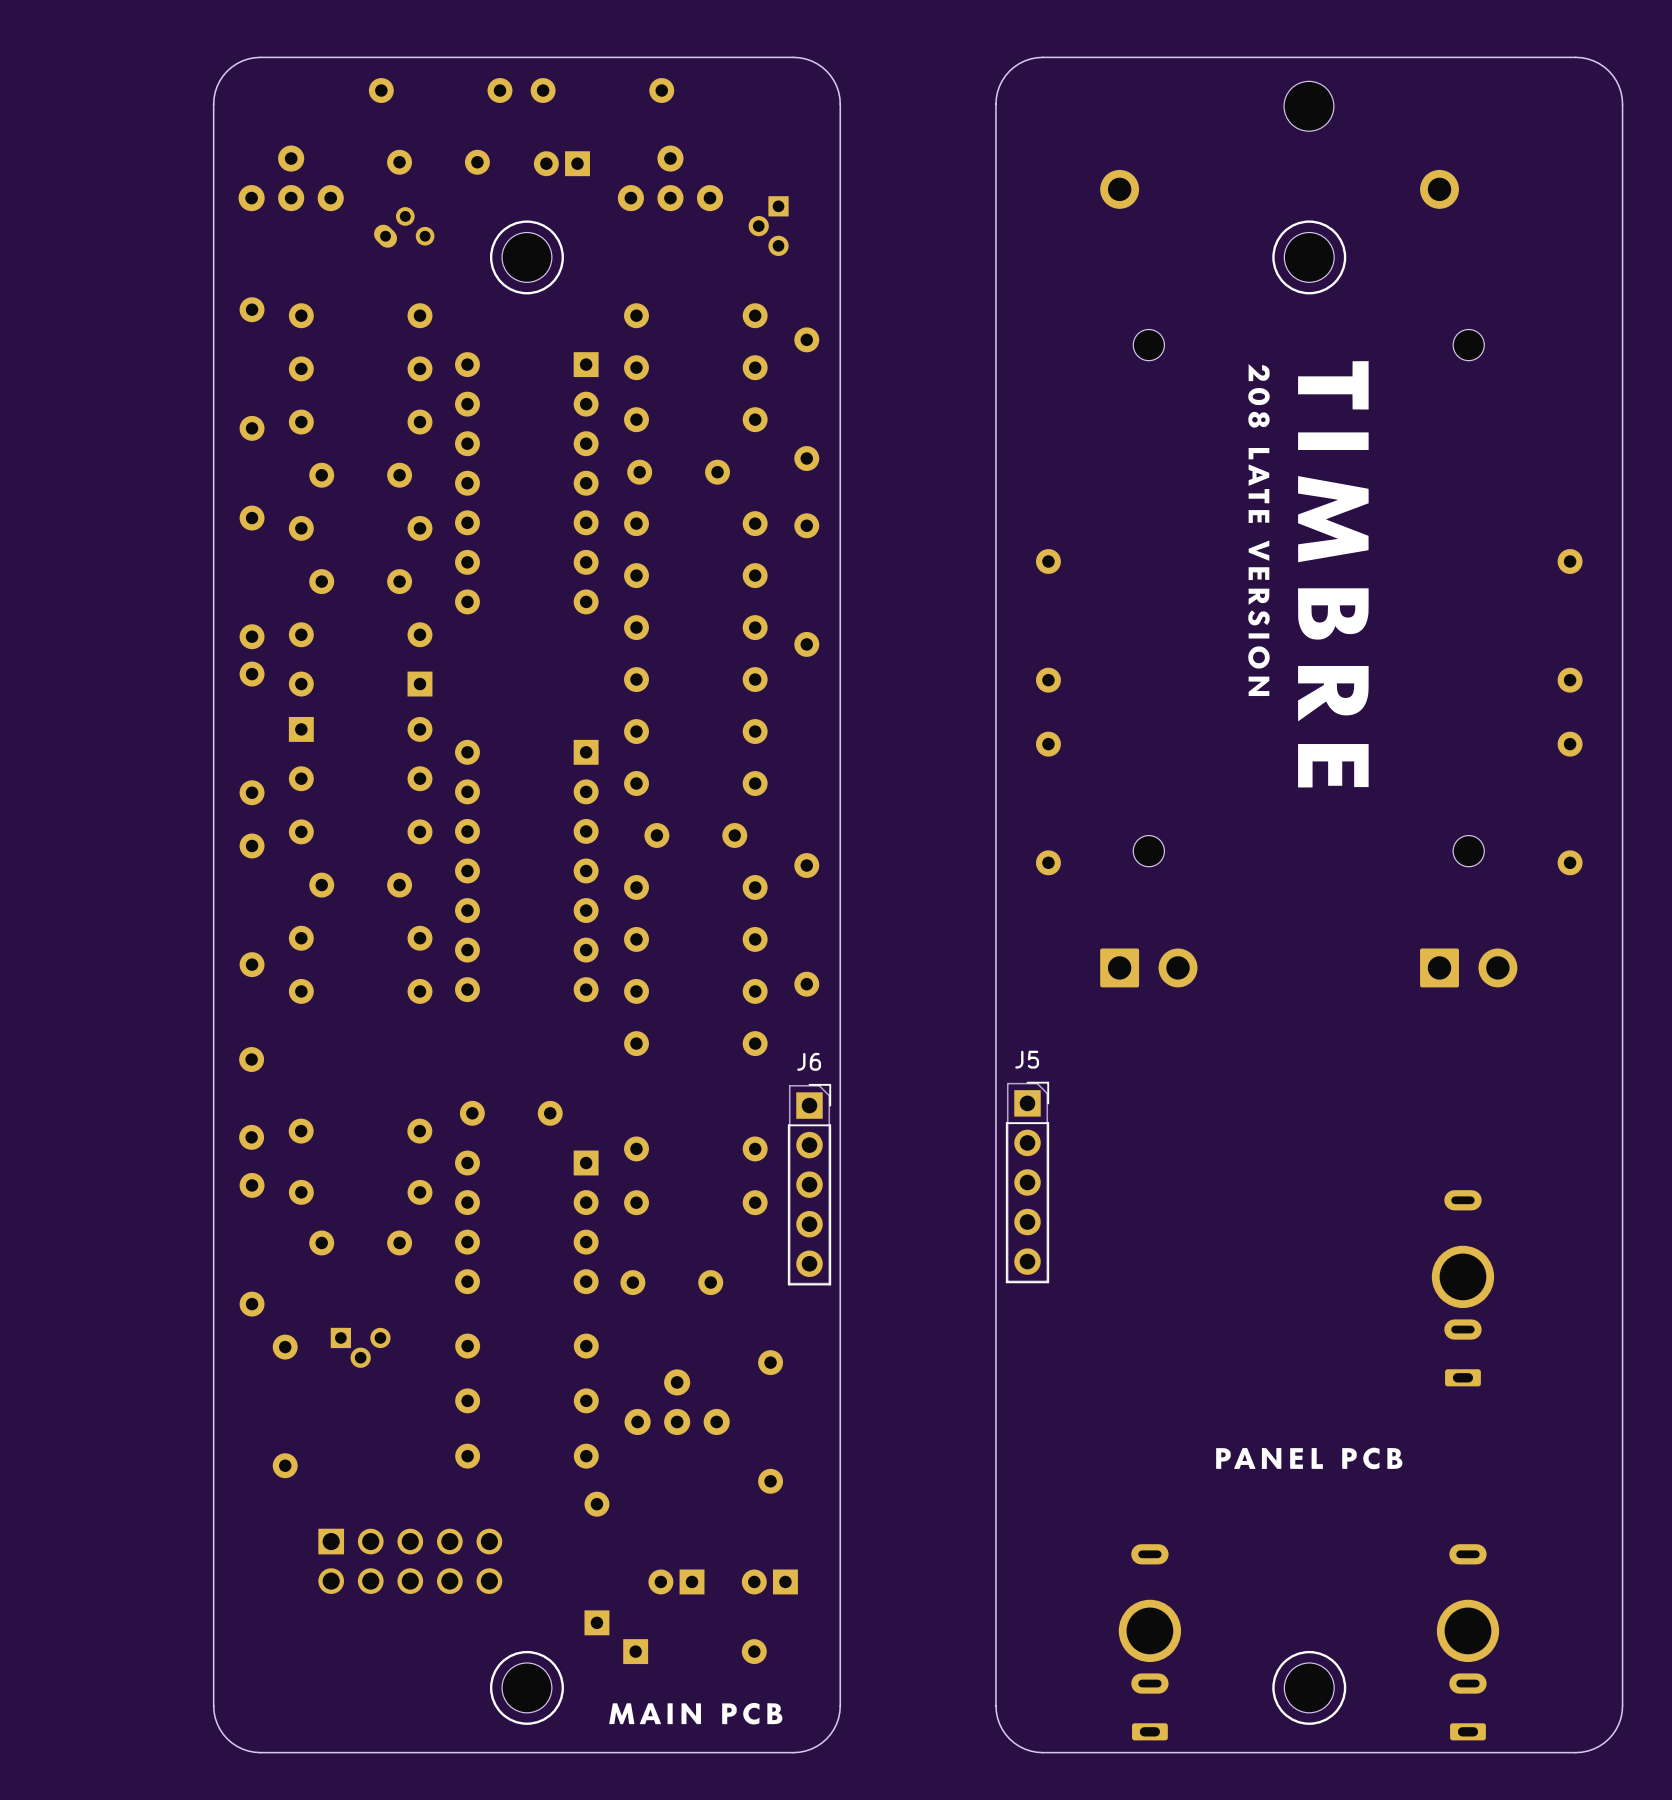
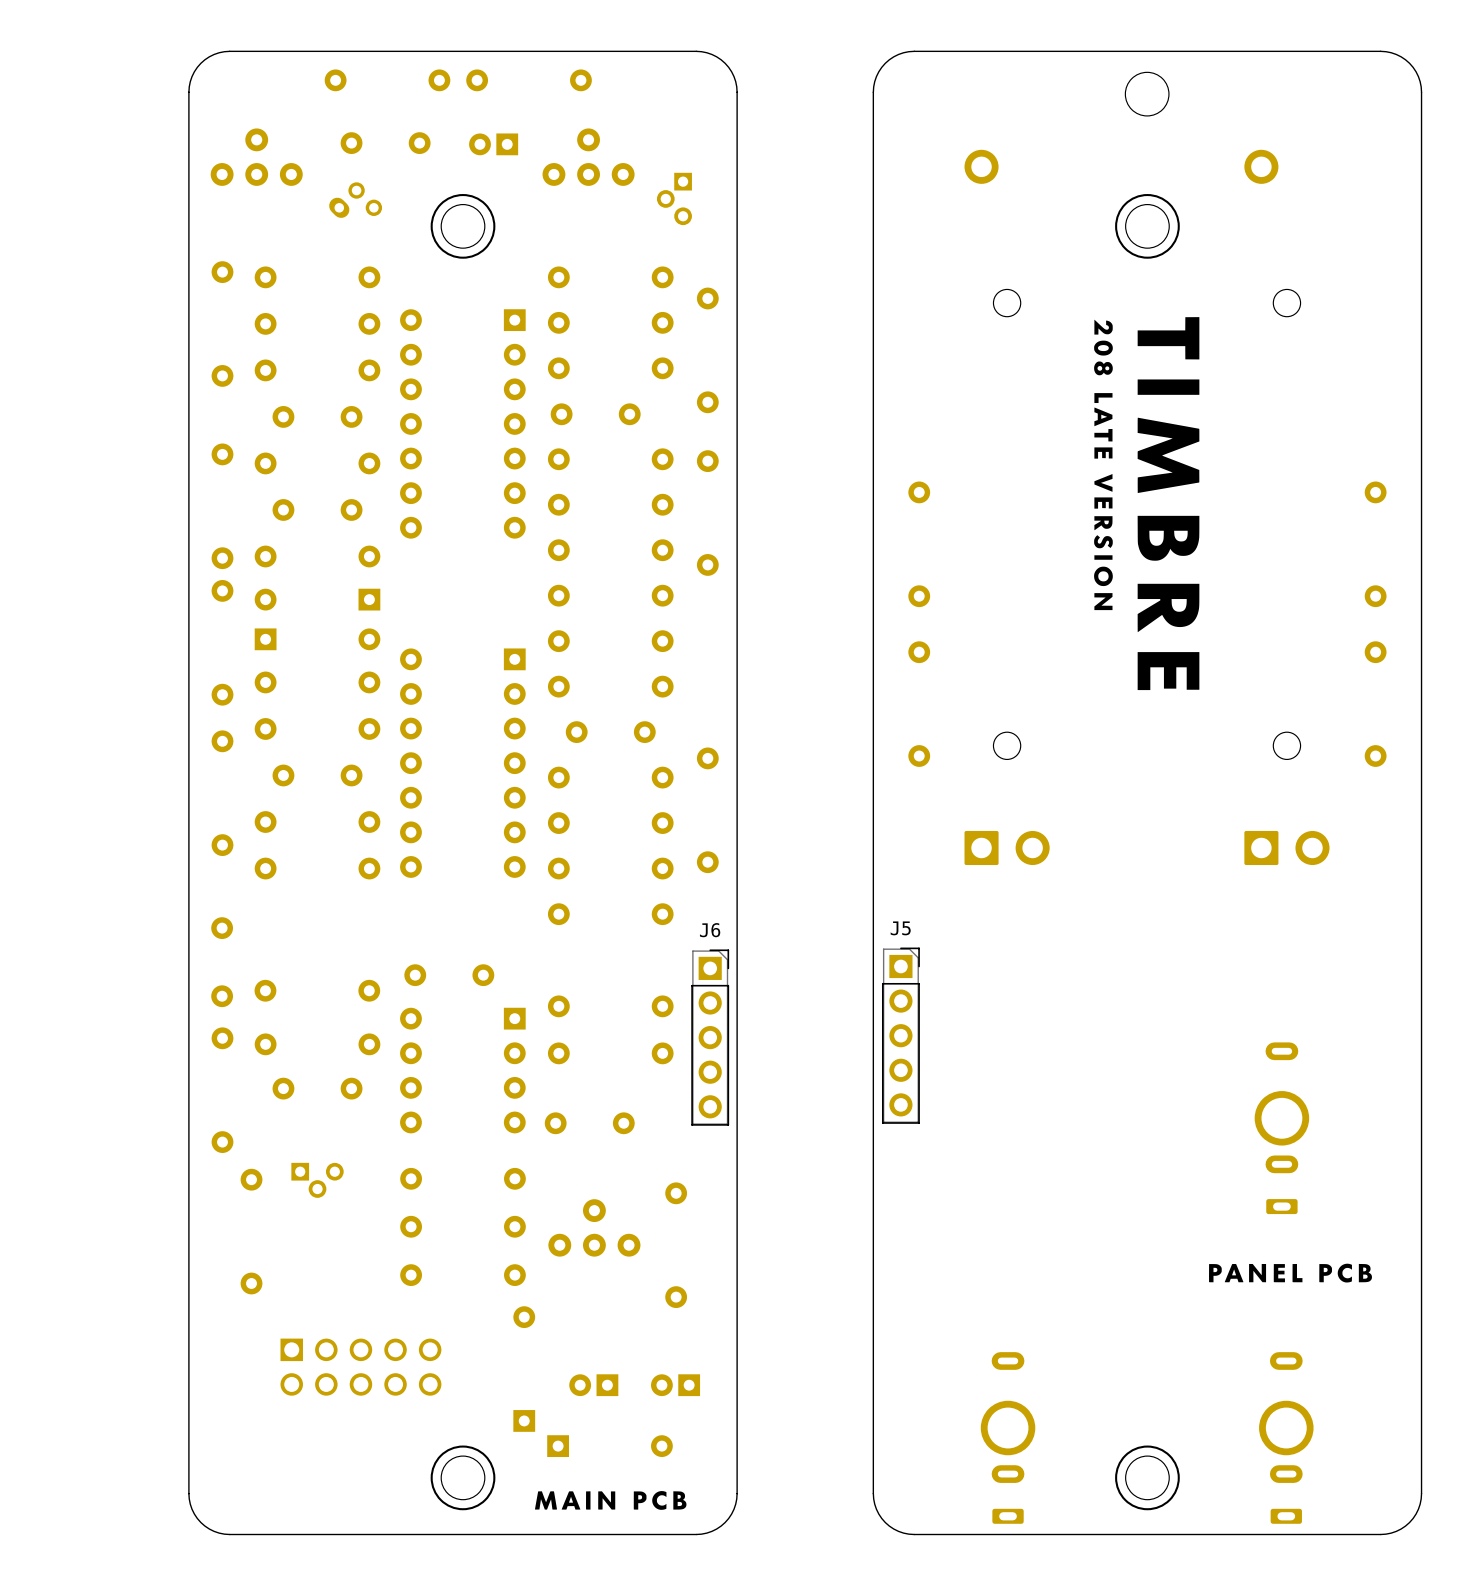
drawing position: (1309, 1458) -> (1290, 1273)

